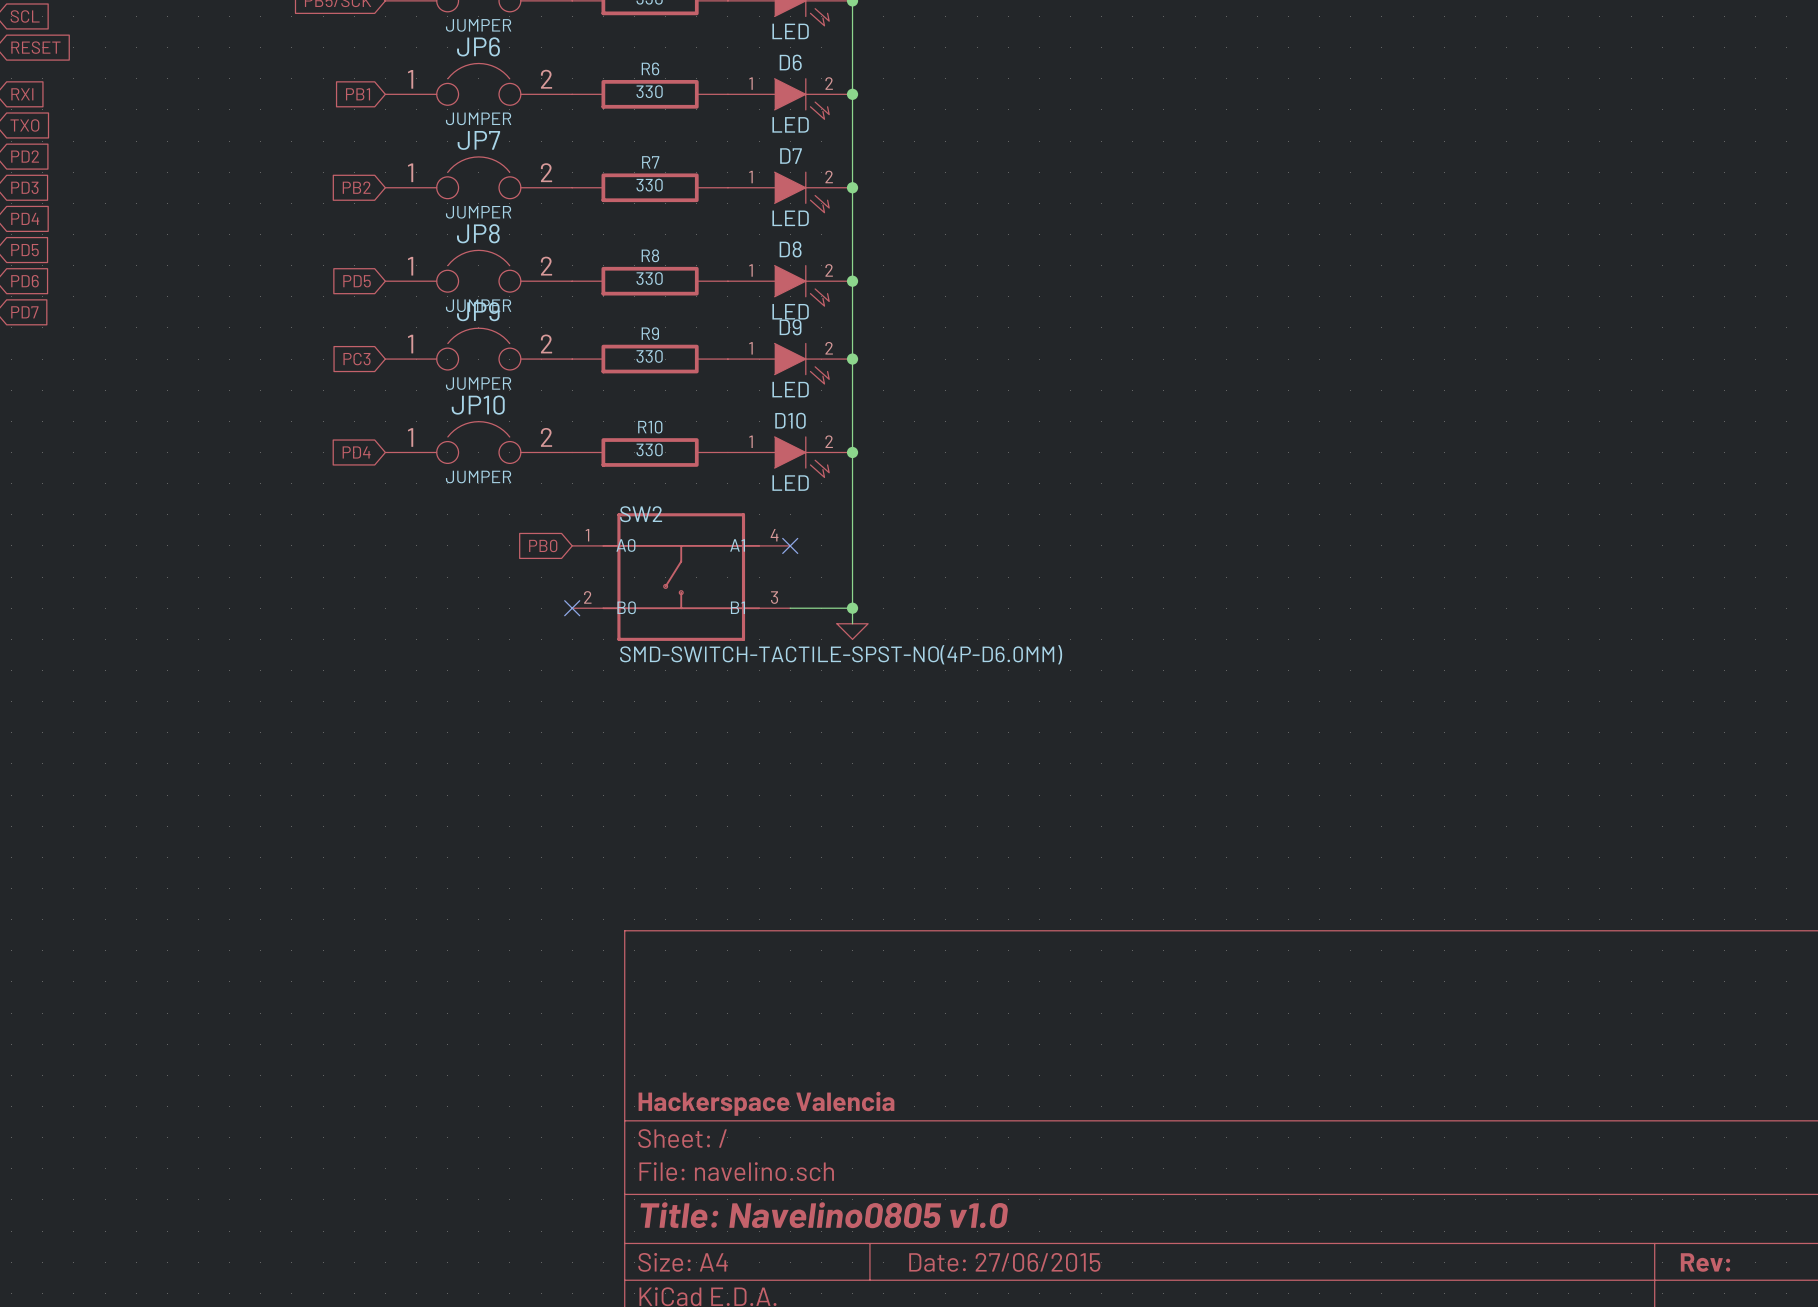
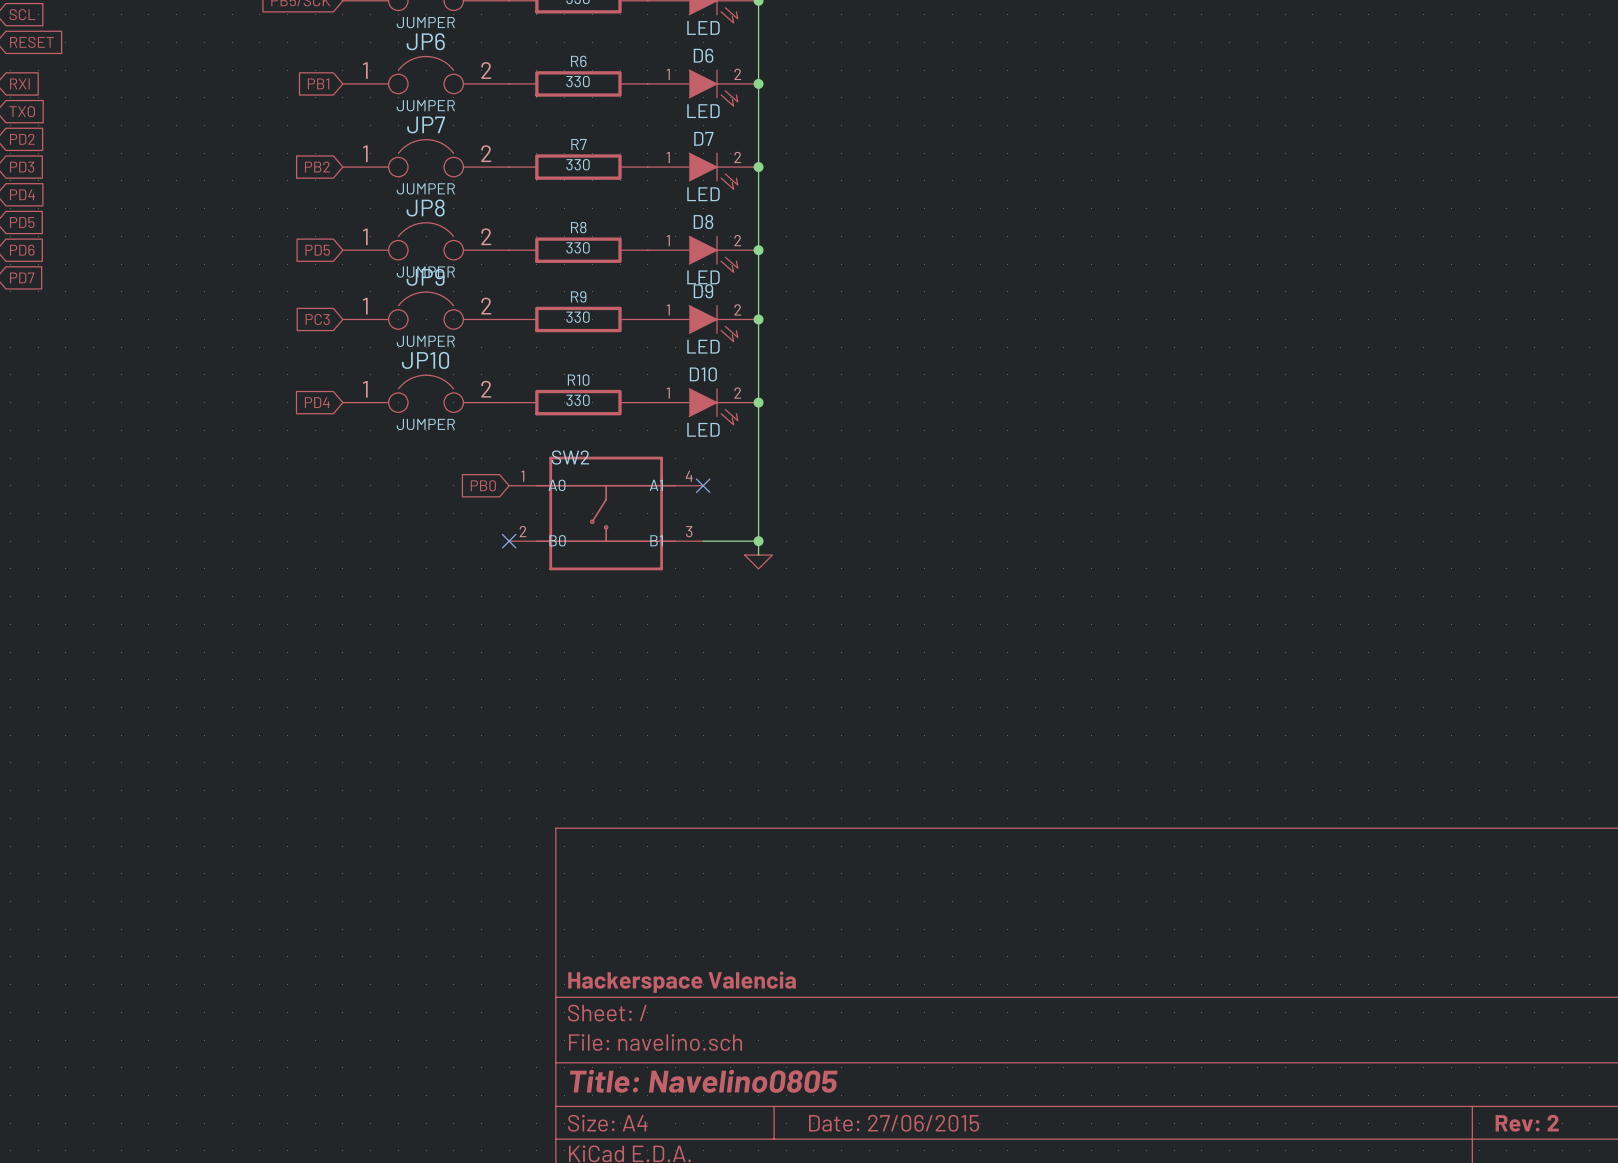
SW2 value: SMD-SWITCH-TACTILE-SPST-NO(4P-D6.0MM) (841, 654) -> none
title block: Title: Navelino0805 v1.0 (824, 1215) -> Title: Navelino0805 (703, 1081)
title block: Rev: (1705, 1262) -> Rev: 2 (1527, 1123)

